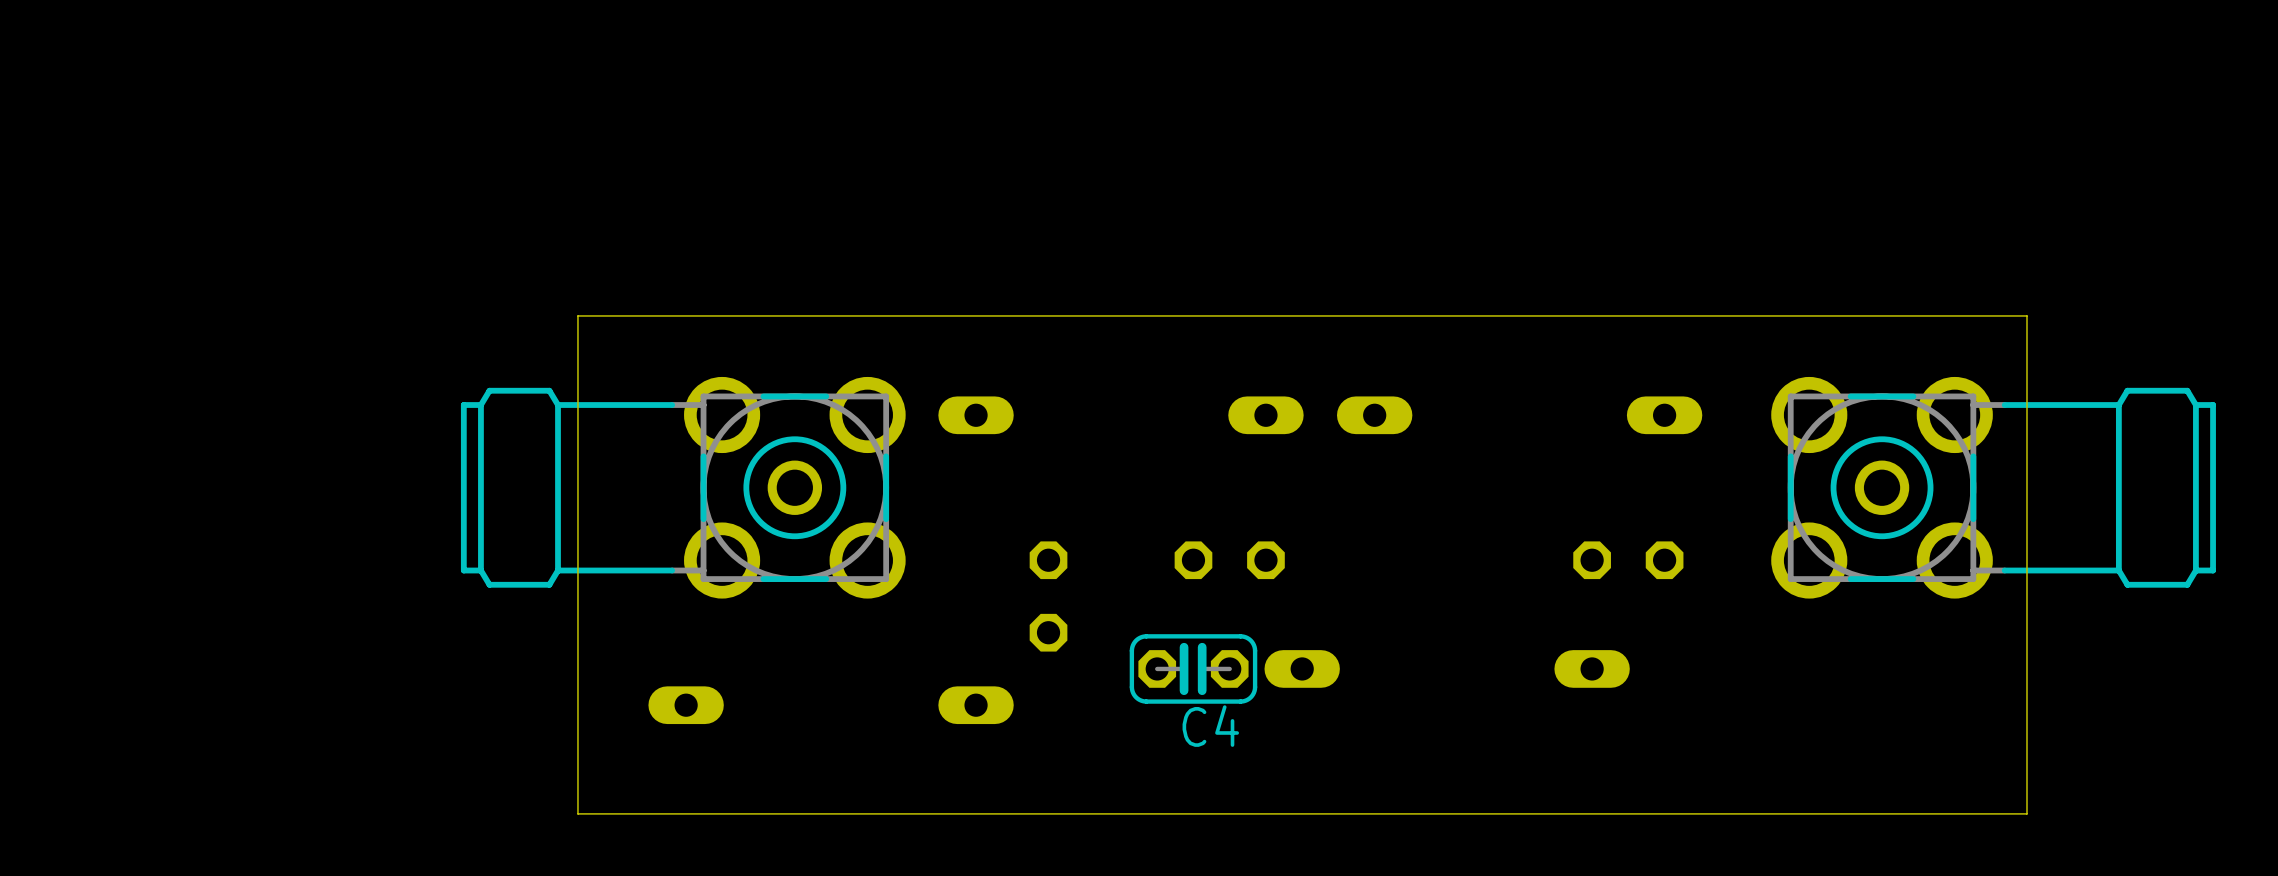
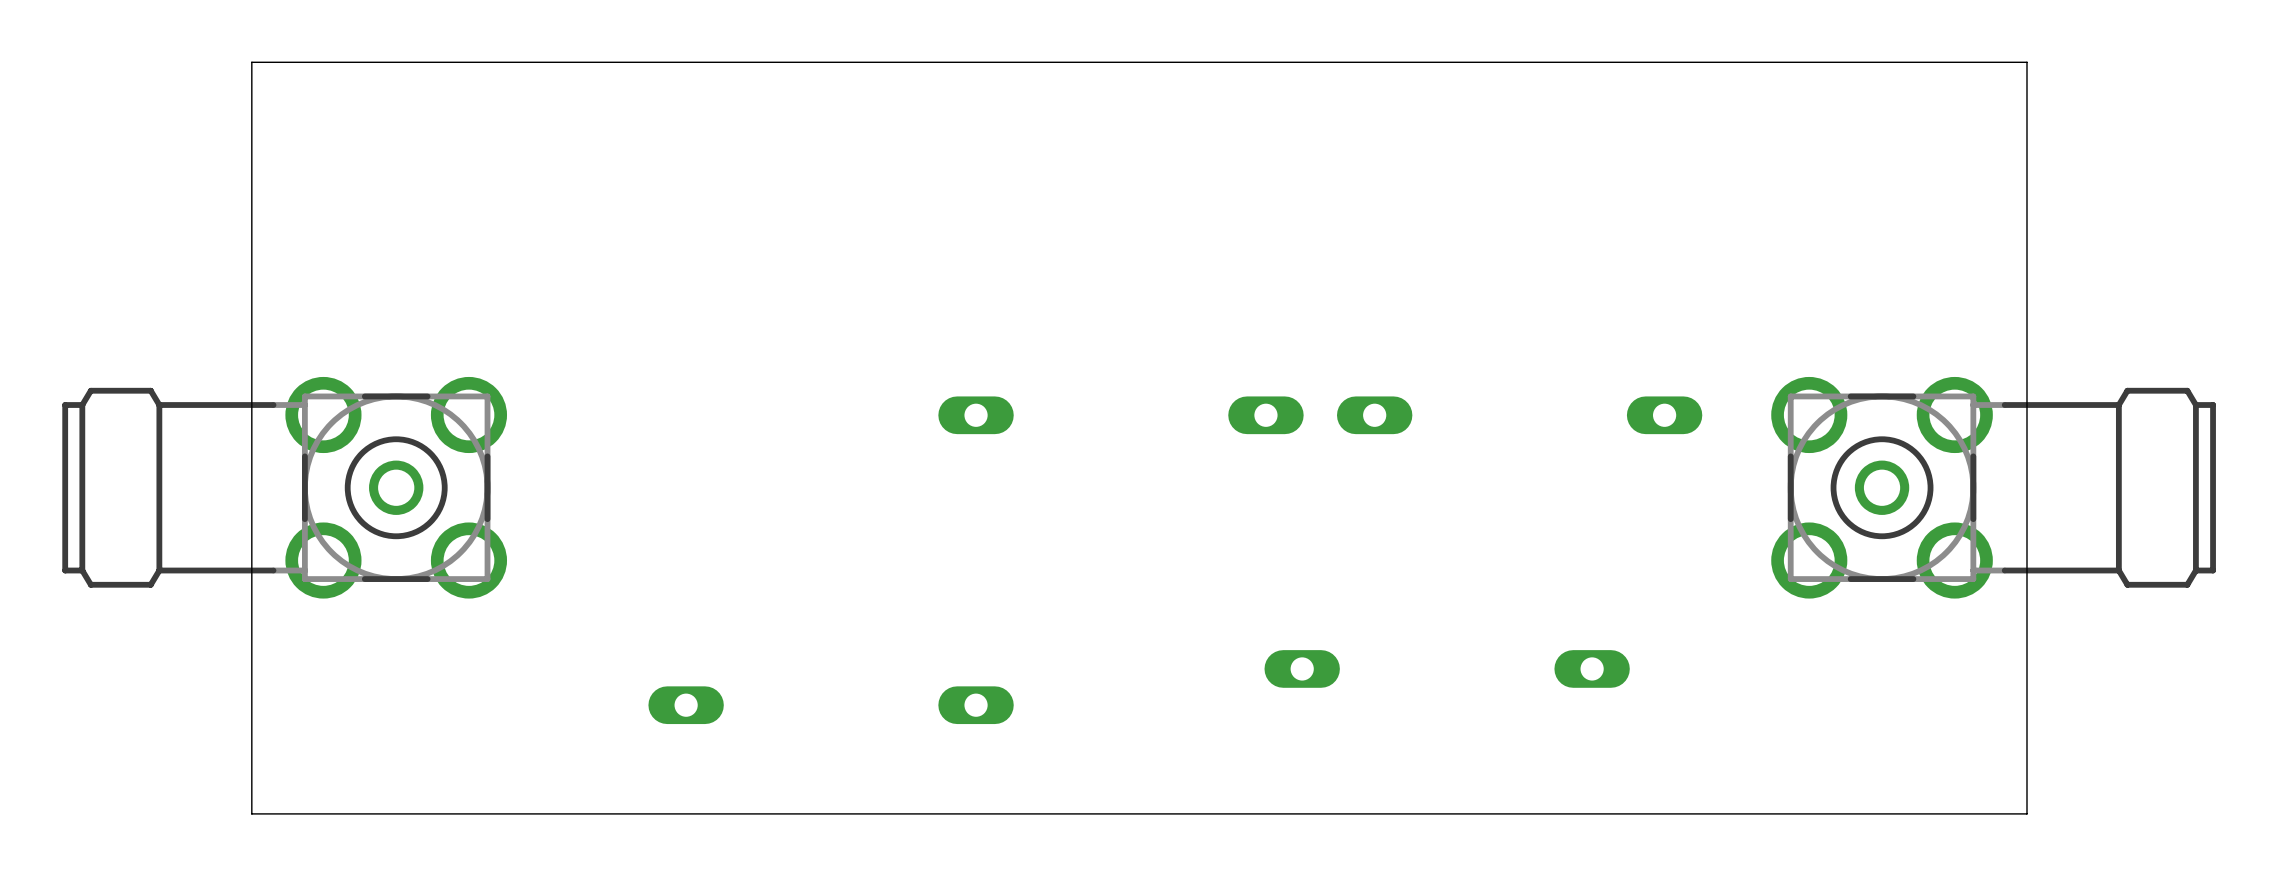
board edge: (2026, 315) (577, 315) (577, 813) -> (2026, 315) (2026, 62) (251, 62) (251, 813) (577, 813)
part position: (683, 487) -> (284, 487)
part: (1229, 560) -> none
part: (1628, 560) -> none
part: (1048, 596) -> none
C4: (1193, 668) -> none

